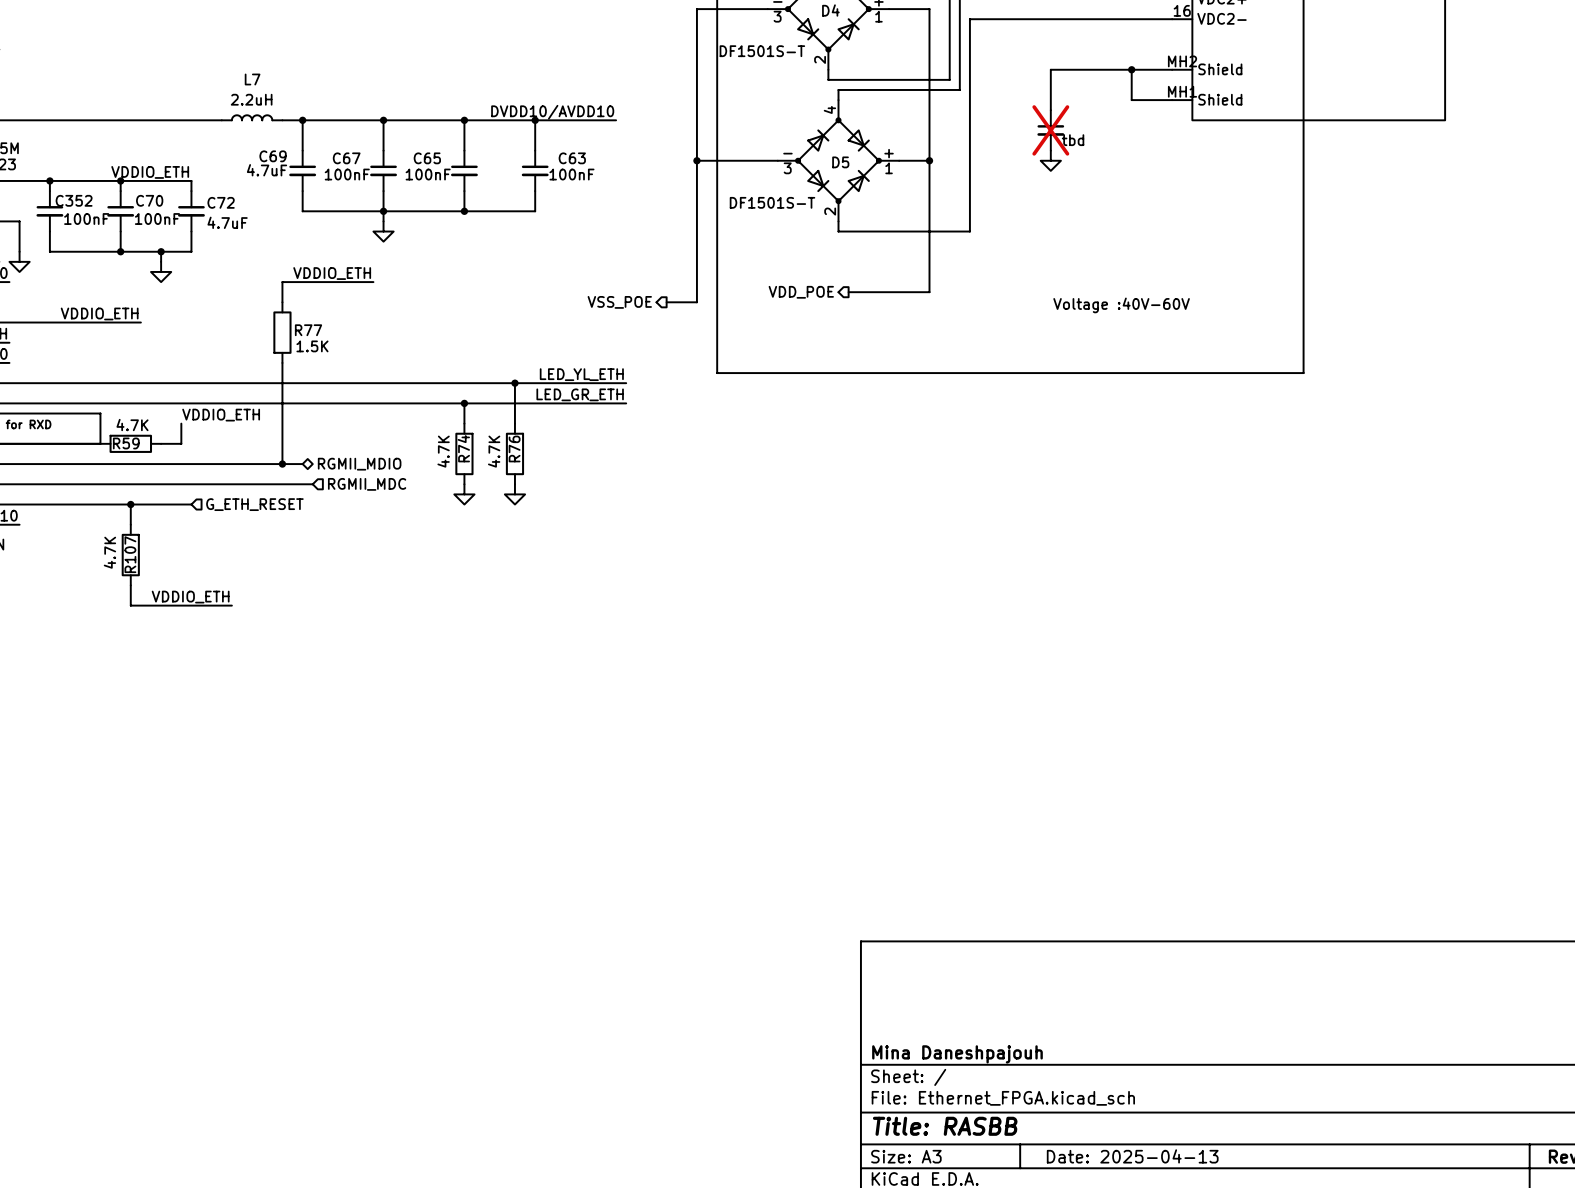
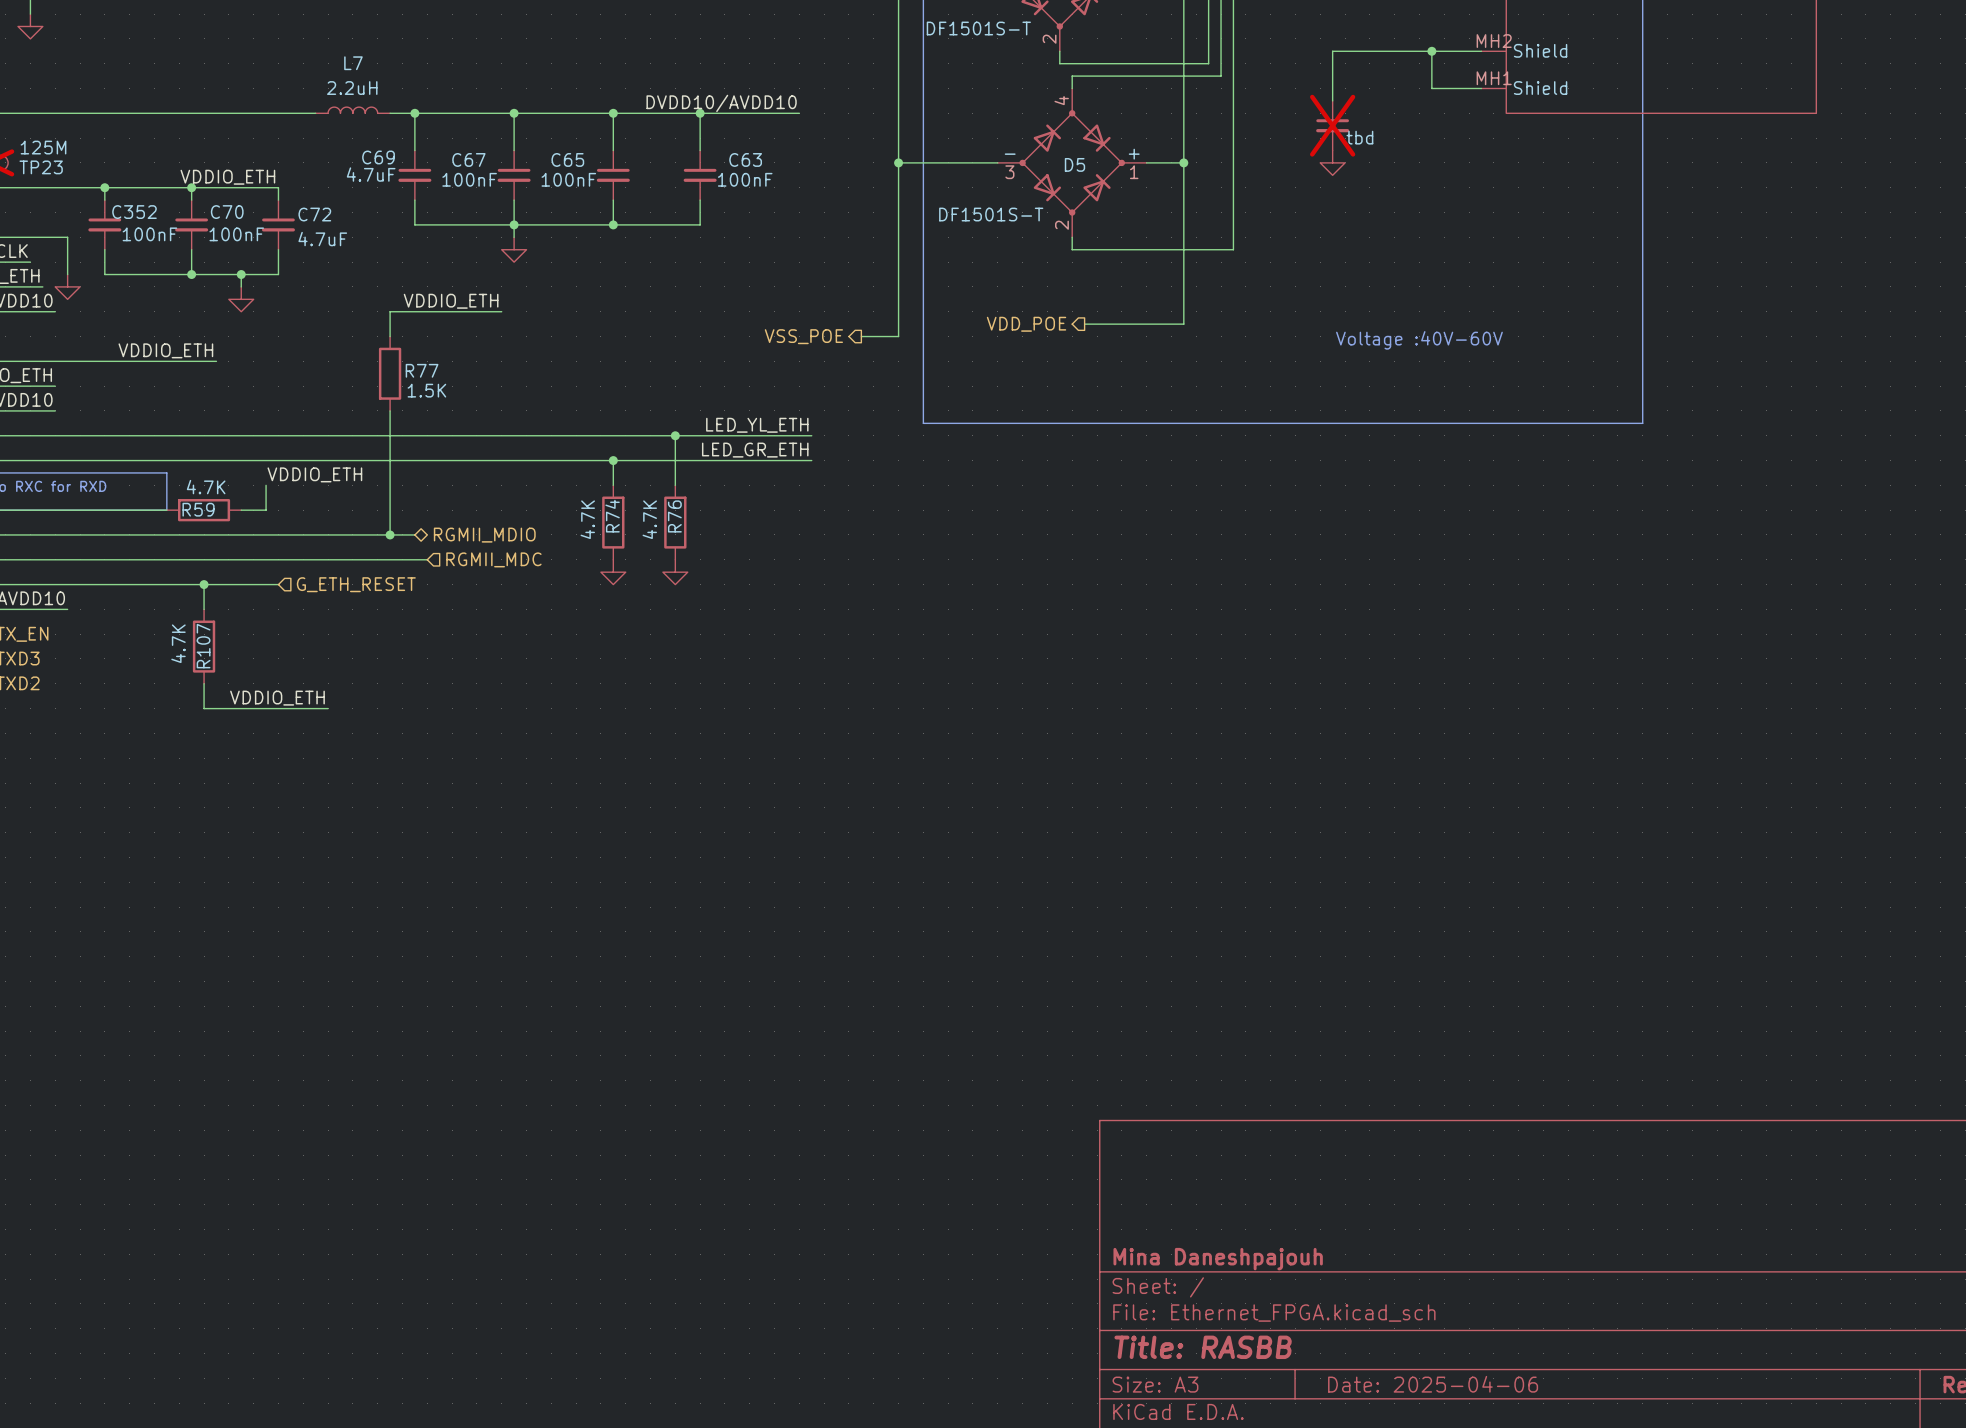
title block: Date: 2025-04-13 (1132, 1156) -> Date: 2025-04-06 (1433, 1384)

